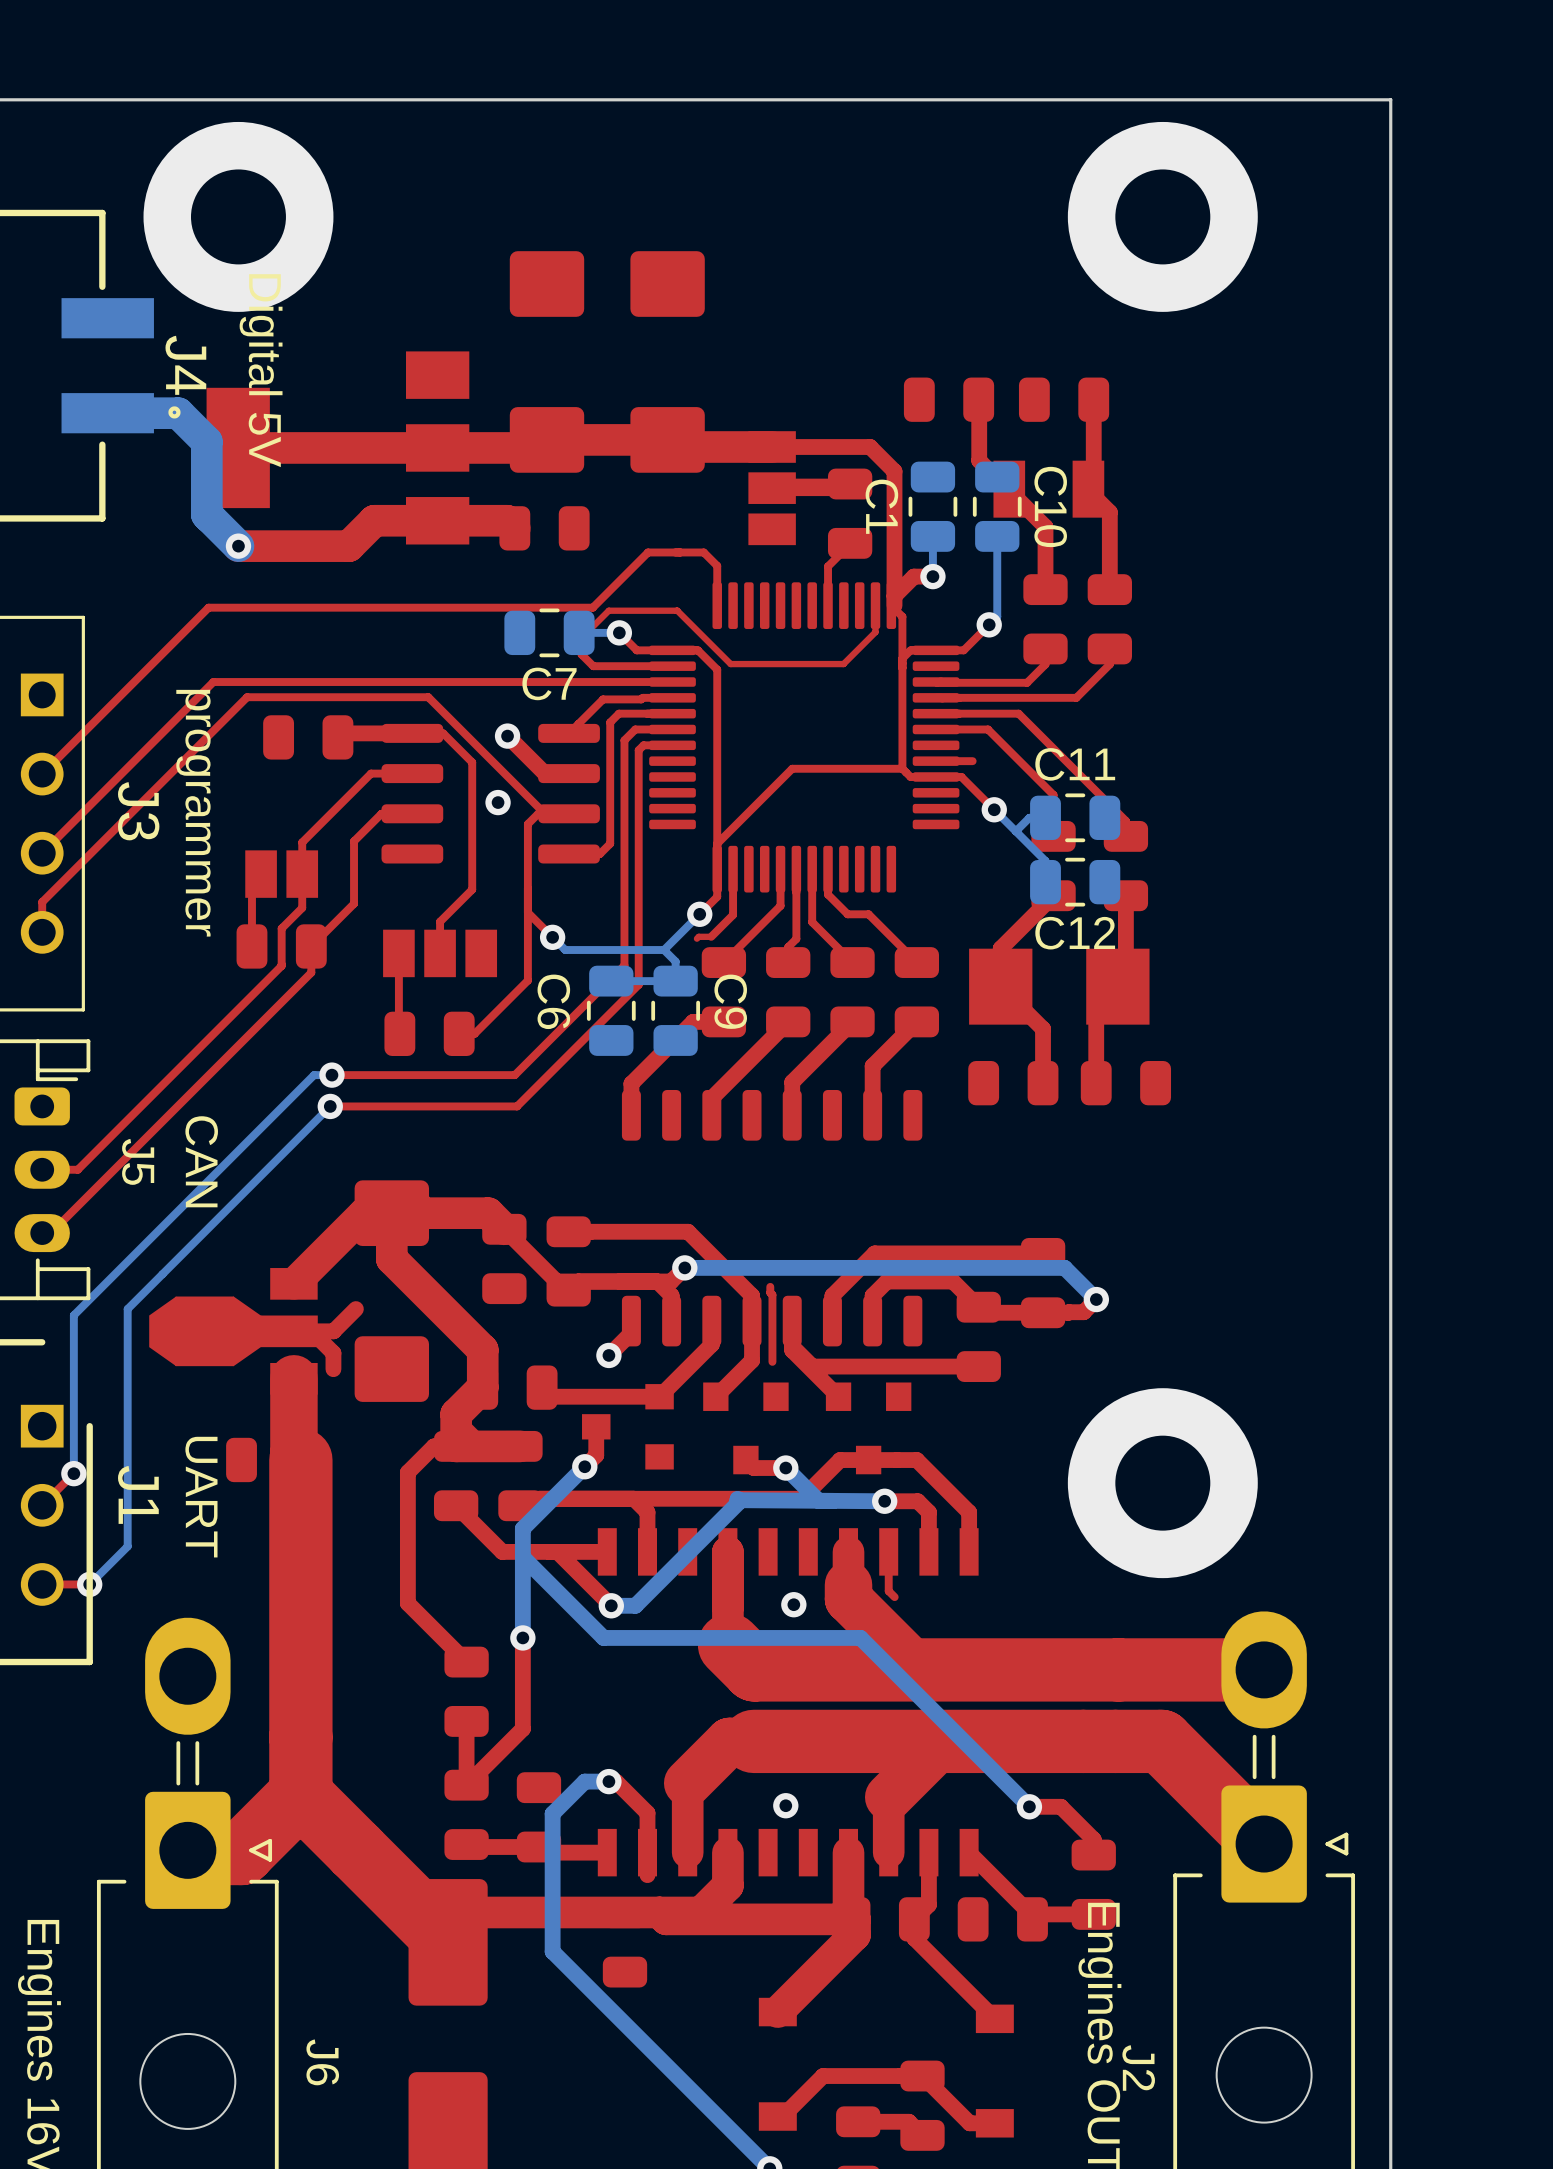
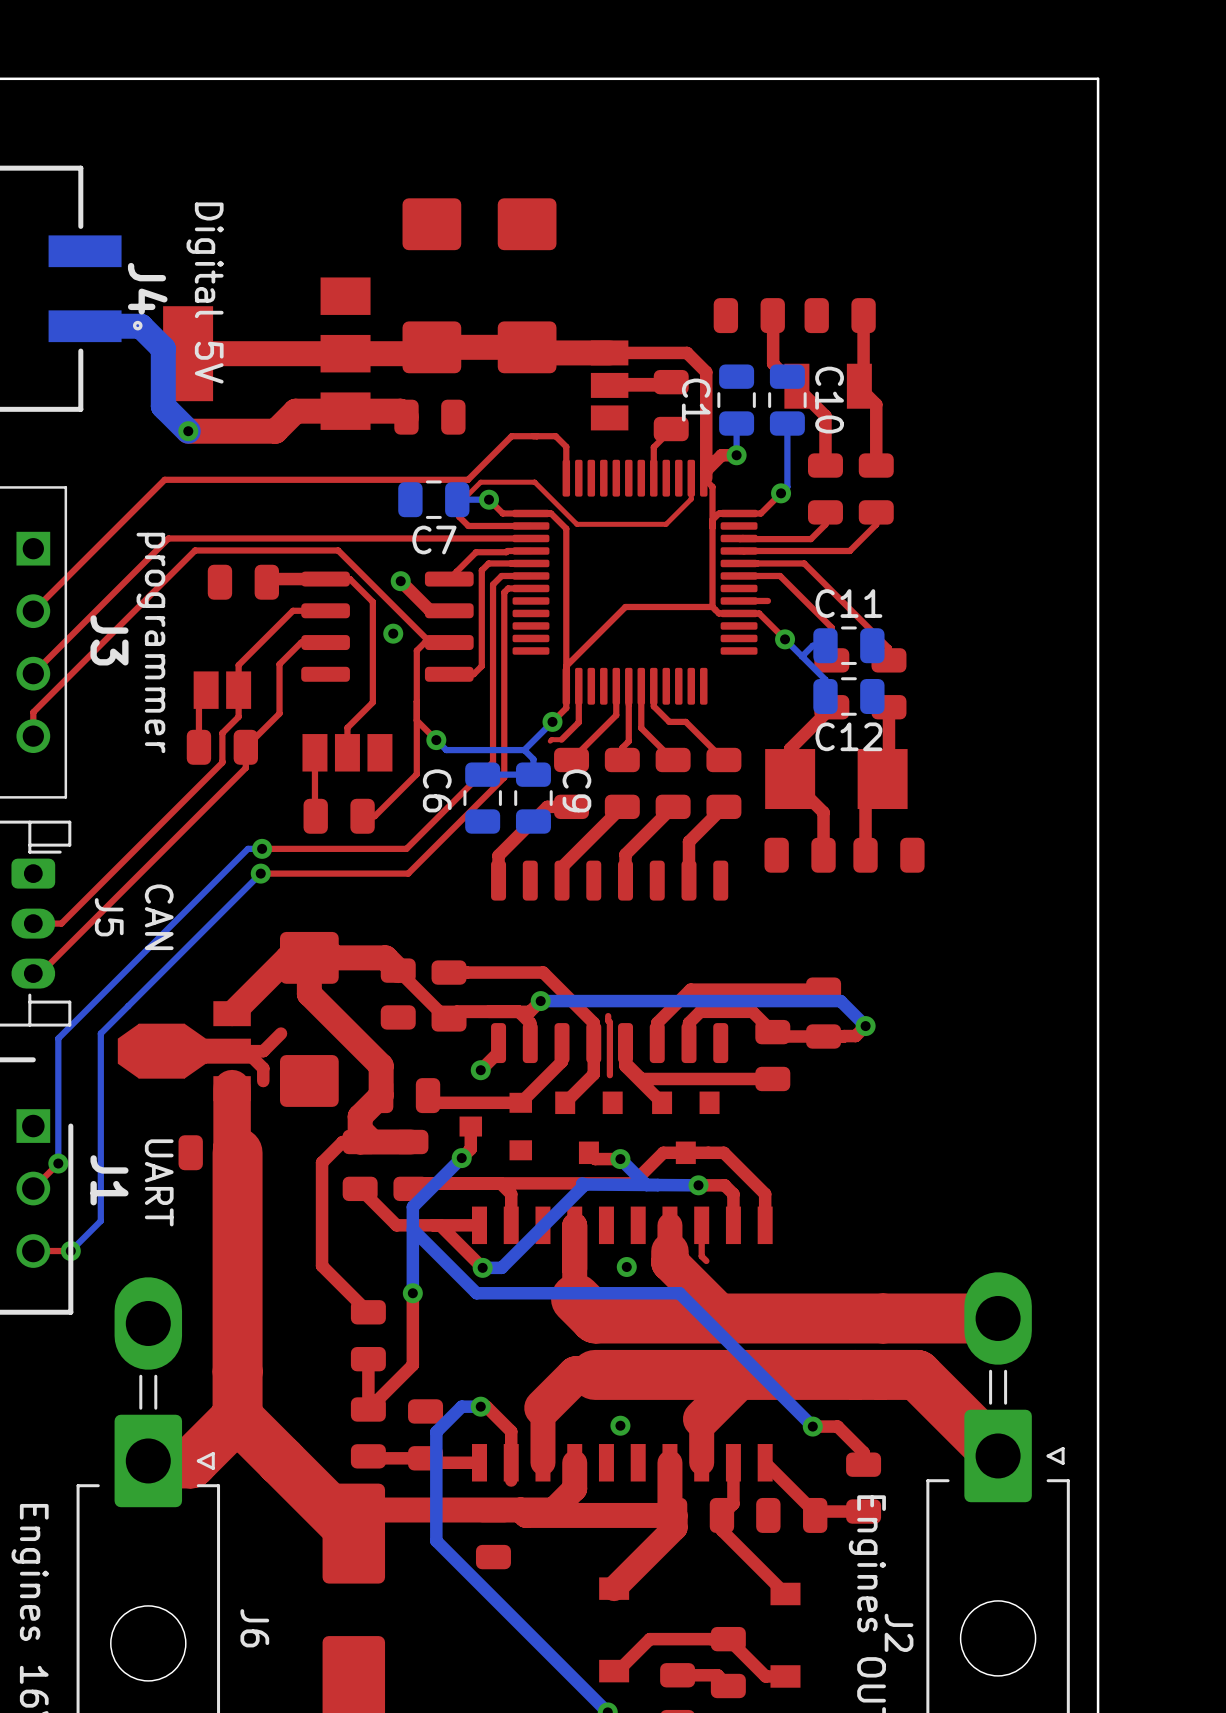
via: (238, 216) -> none
via: (1162, 216) -> none
via: (1162, 1483) -> none

